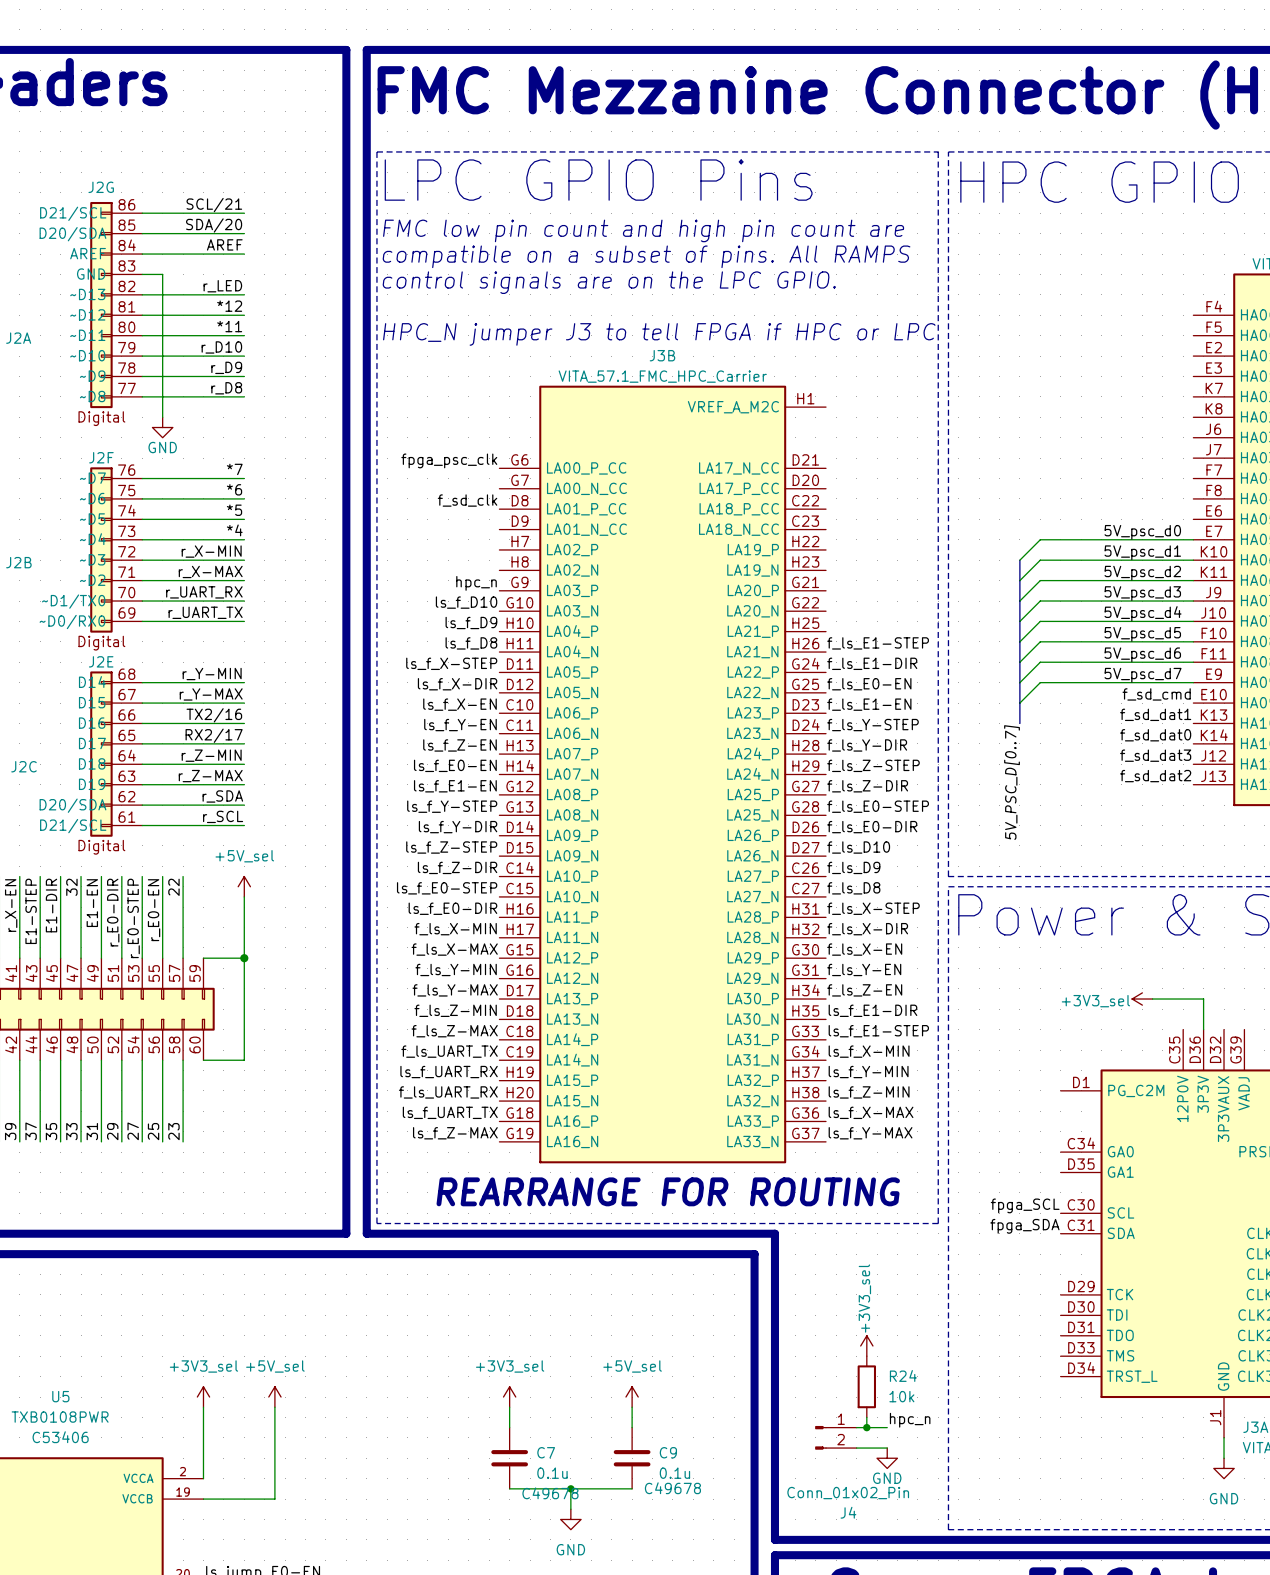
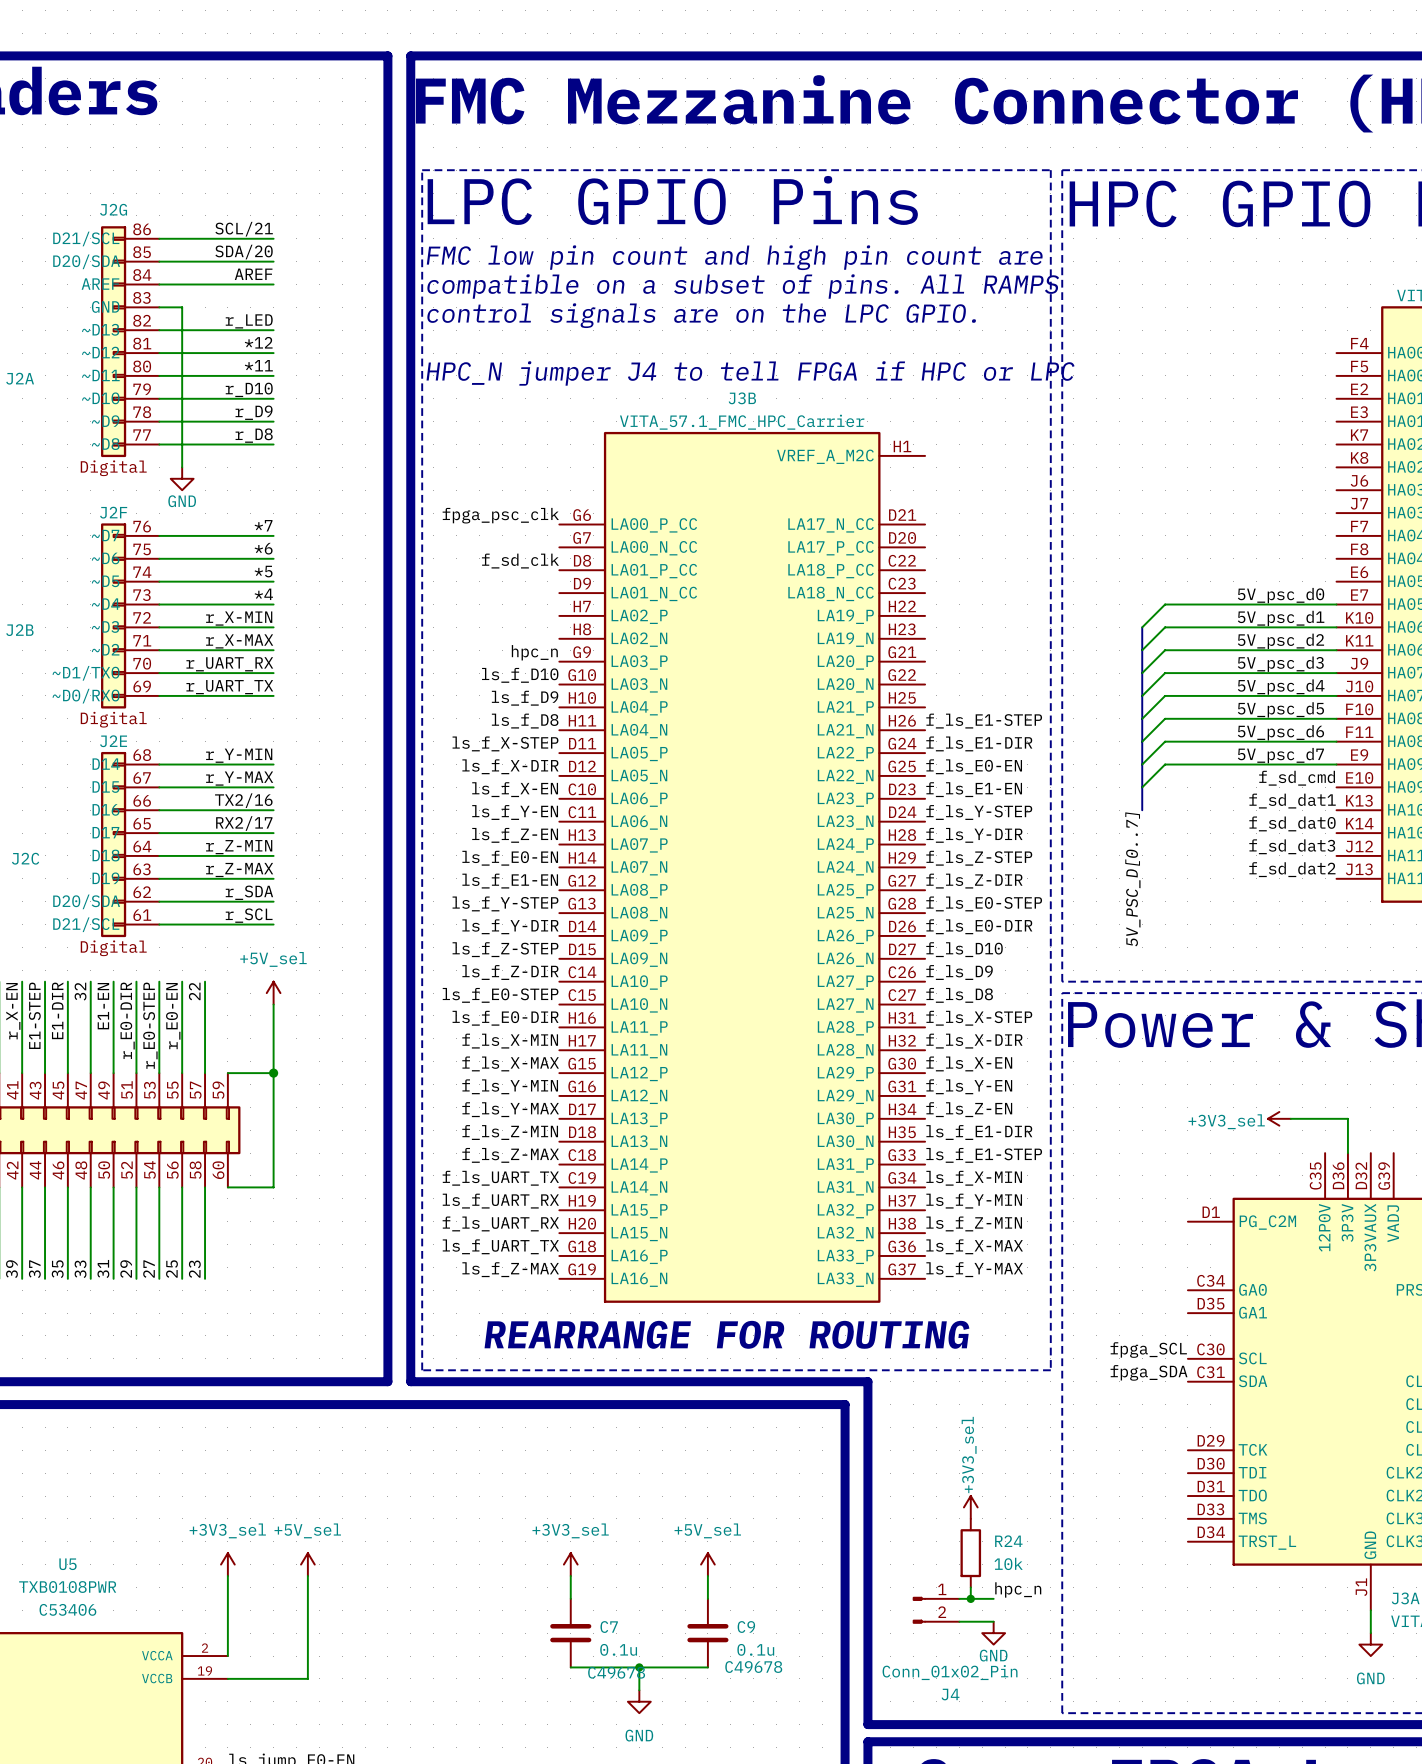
text: HPC_N jumper J3 to tell FPGA if HPC or LPC (659, 334) -> HPC_N jumper J4 to tell FPGA if HPC or LPC (750, 373)

